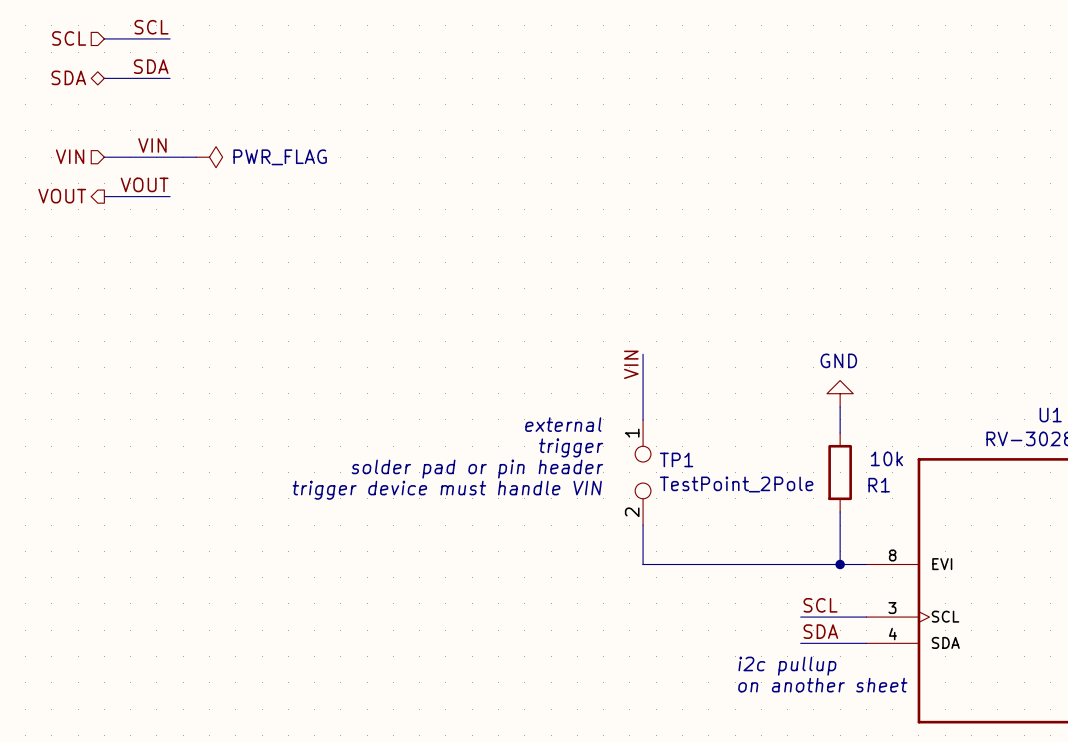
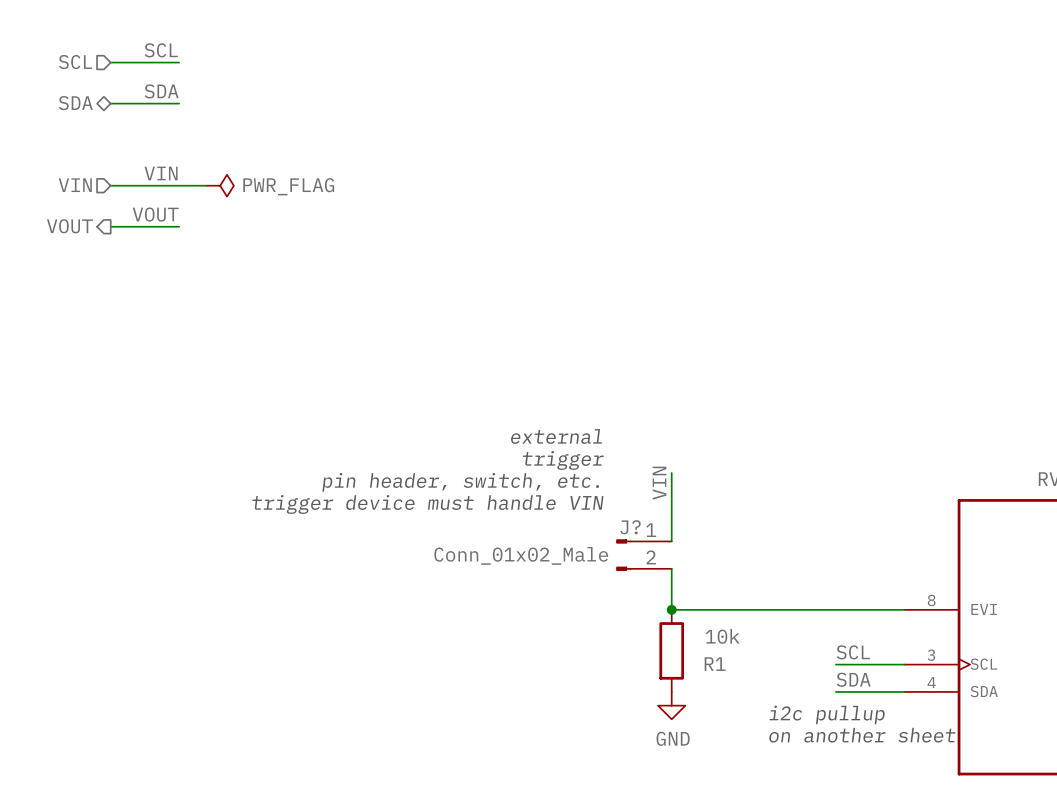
wire: (643, 354) (643, 419) -> (671, 473) (671, 541)
label position: VIN (631, 364) -> VIN (659, 483)
power symbol: GND (840, 393) -> none
wire: (840, 406) (840, 433) -> none
text position: external (563, 424) -> external (556, 436)
text: none -> pin header, switch, etc. (460, 482)
text position: trigger (571, 447) -> trigger (563, 460)
text: solder pad or pin header (477, 469) -> none
TP1: TestPoint_2Pole (643, 472) -> none
R1 position: (840, 472) -> (671, 650)
text position: trigger device must handle VIN (447, 490) -> trigger device must handle VIN (427, 504)
J?: none -> Conn_01x02_Male (643, 555)
wire: (840, 511) (840, 564) -> none
junction: none -> (671, 609)
junction: (840, 564) -> none
power symbol: none -> GND (671, 705)

